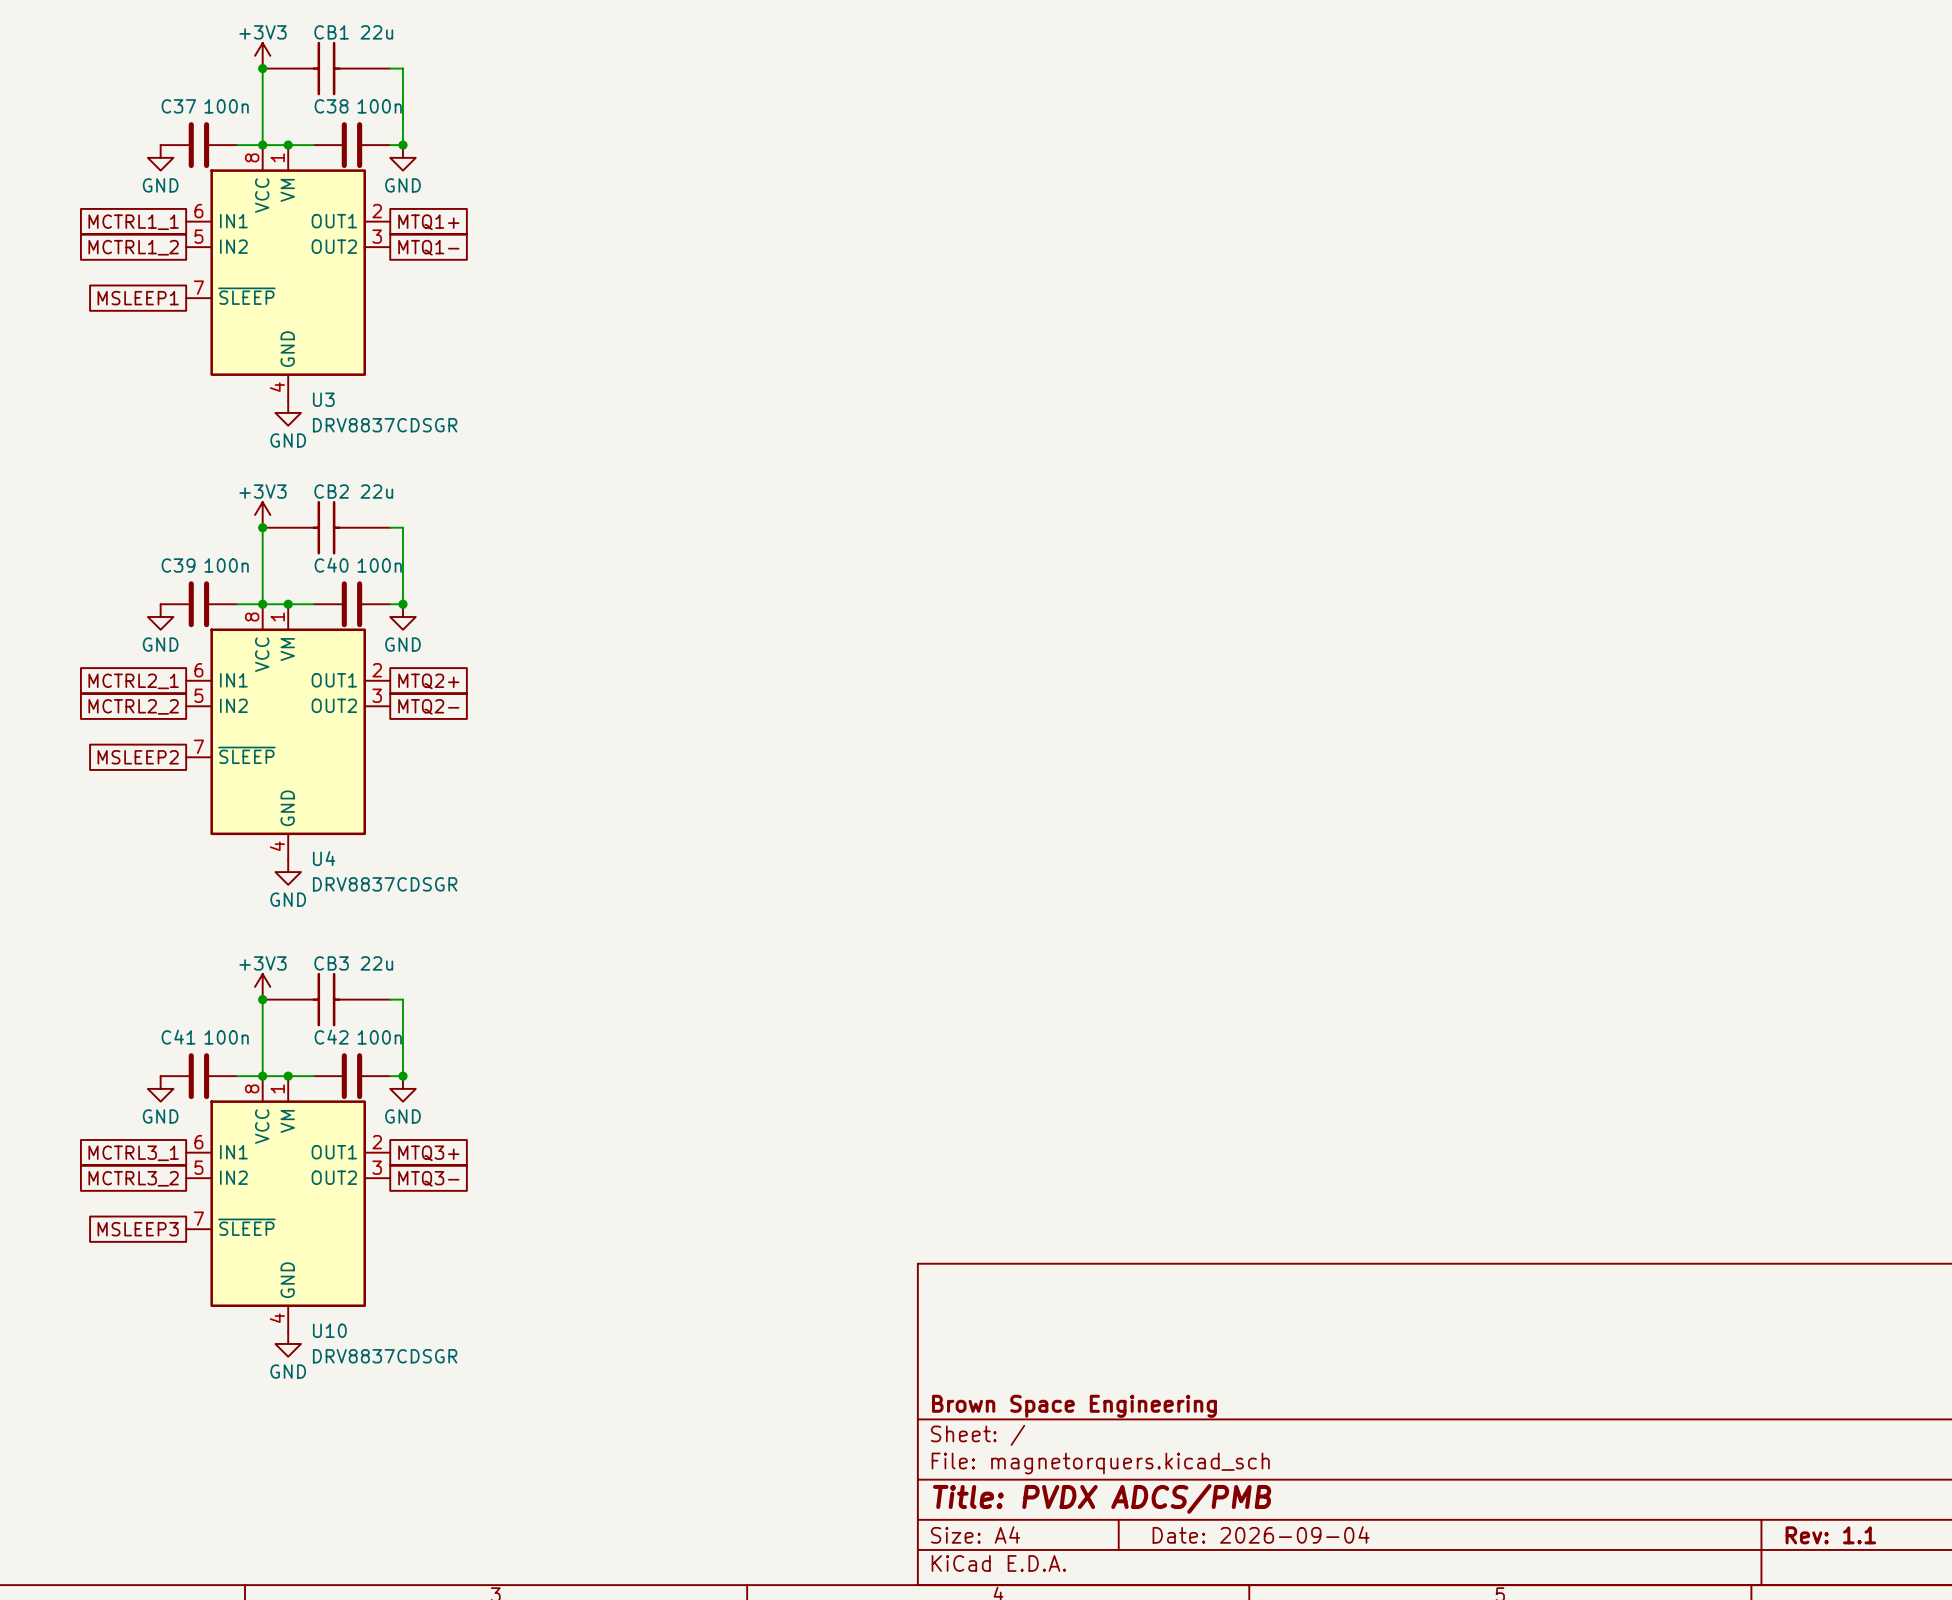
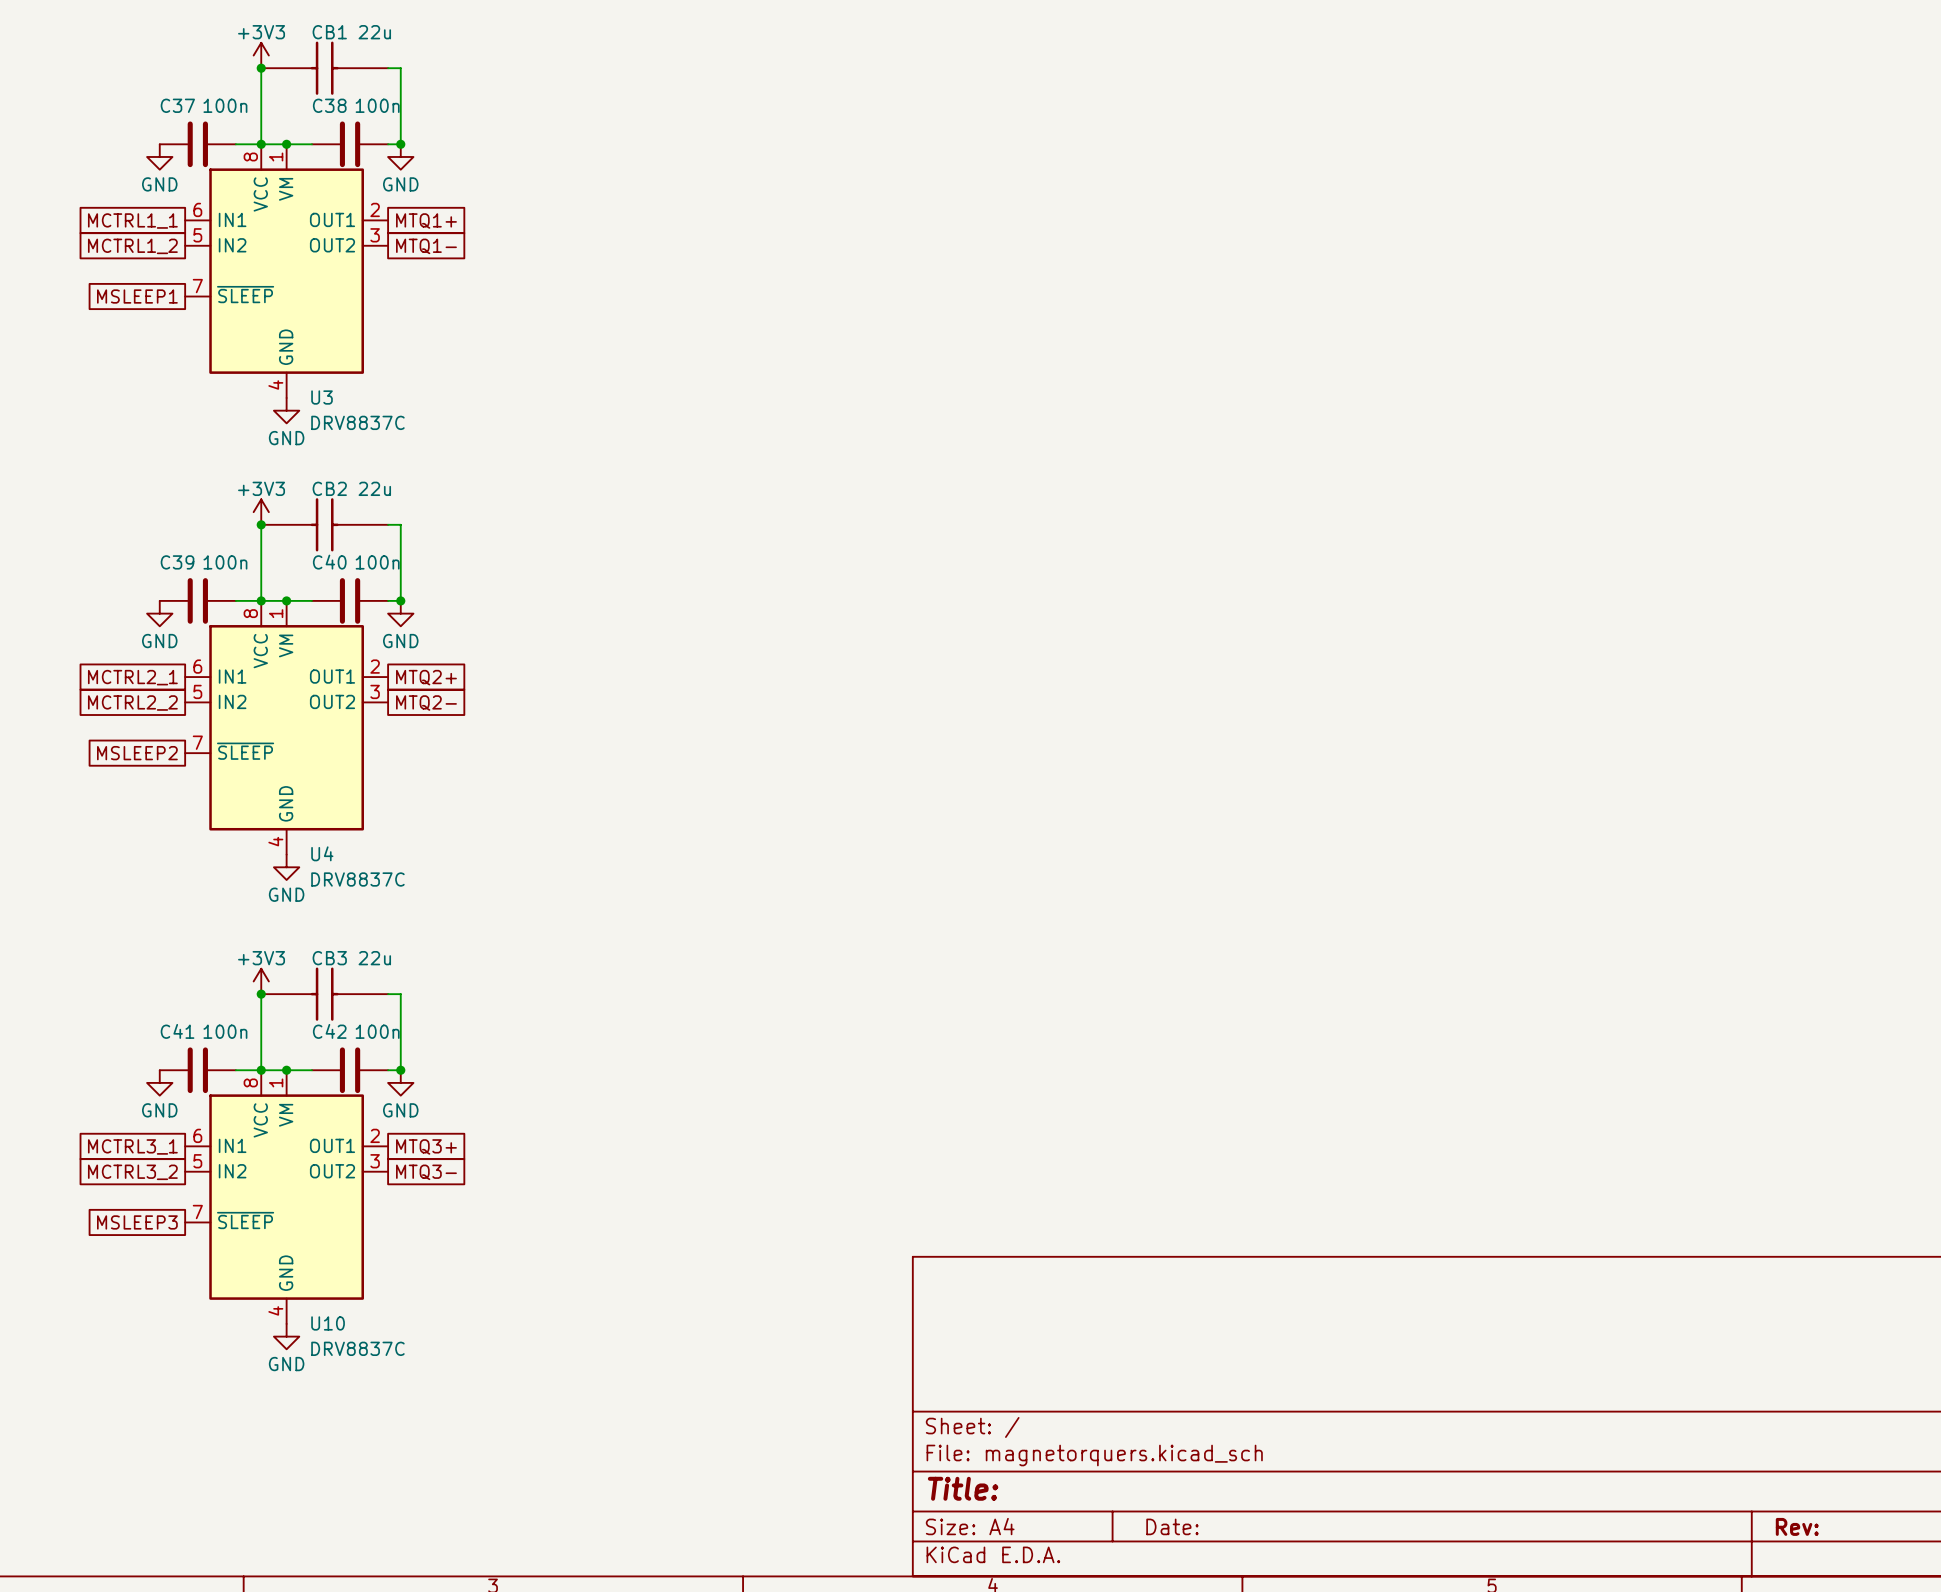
U3 value: DRV8837CDSGR (385, 425) -> DRV8837C (357, 422)
U4 value: DRV8837CDSGR (385, 884) -> DRV8837C (357, 879)
U10 value: DRV8837CDSGR (385, 1356) -> DRV8837C (357, 1348)
title block: Brown Space Engineering (1074, 1406) -> none
title block: Title: PVDX ADCS/PMB (1102, 1498) -> Title: (963, 1488)
title block: Date: 2026-09-04 (1261, 1534) -> Date: (1172, 1526)
title block: Rev: 1.1 (1830, 1535) -> Rev: (1797, 1526)

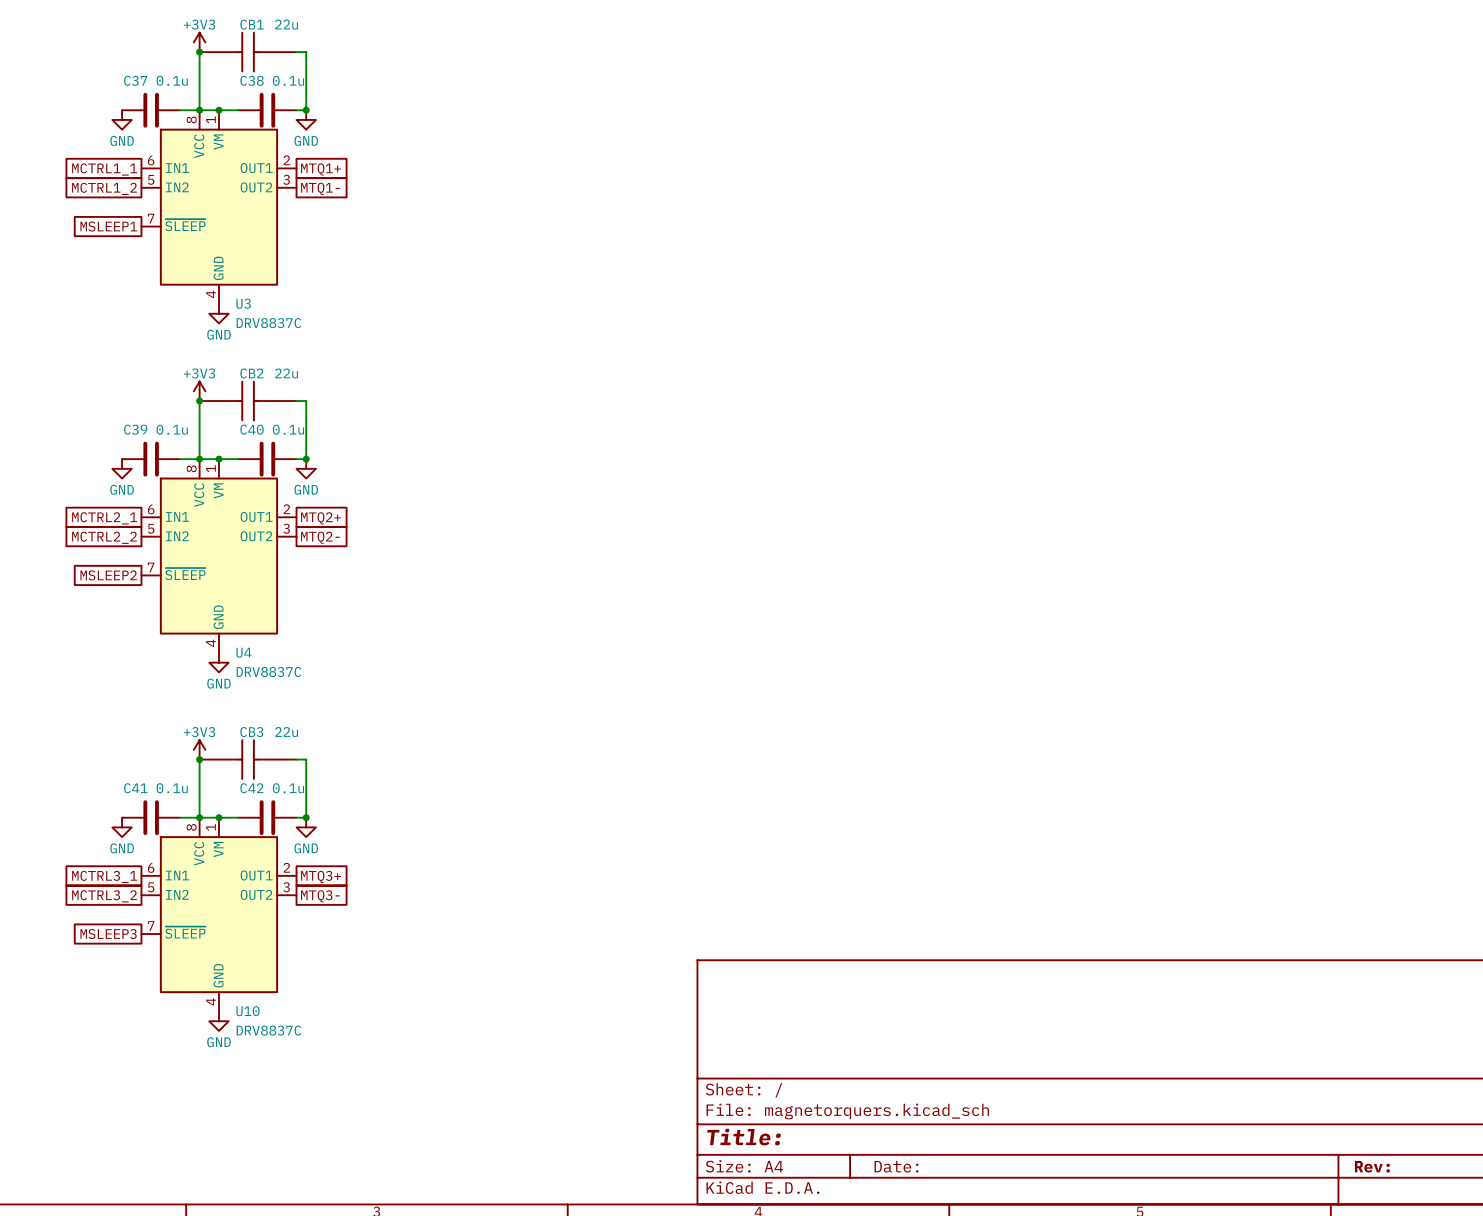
C37 value: 100n (225, 105) -> 0.1u (172, 80)
C38 value: 100n (377, 105) -> 0.1u (288, 80)
C39 value: 100n (225, 562) -> 0.1u (172, 429)
C40 value: 100n (377, 562) -> 0.1u (288, 429)
C41 value: 100n (225, 1031) -> 0.1u (172, 788)
C42 value: 100n (377, 1031) -> 0.1u (288, 788)

